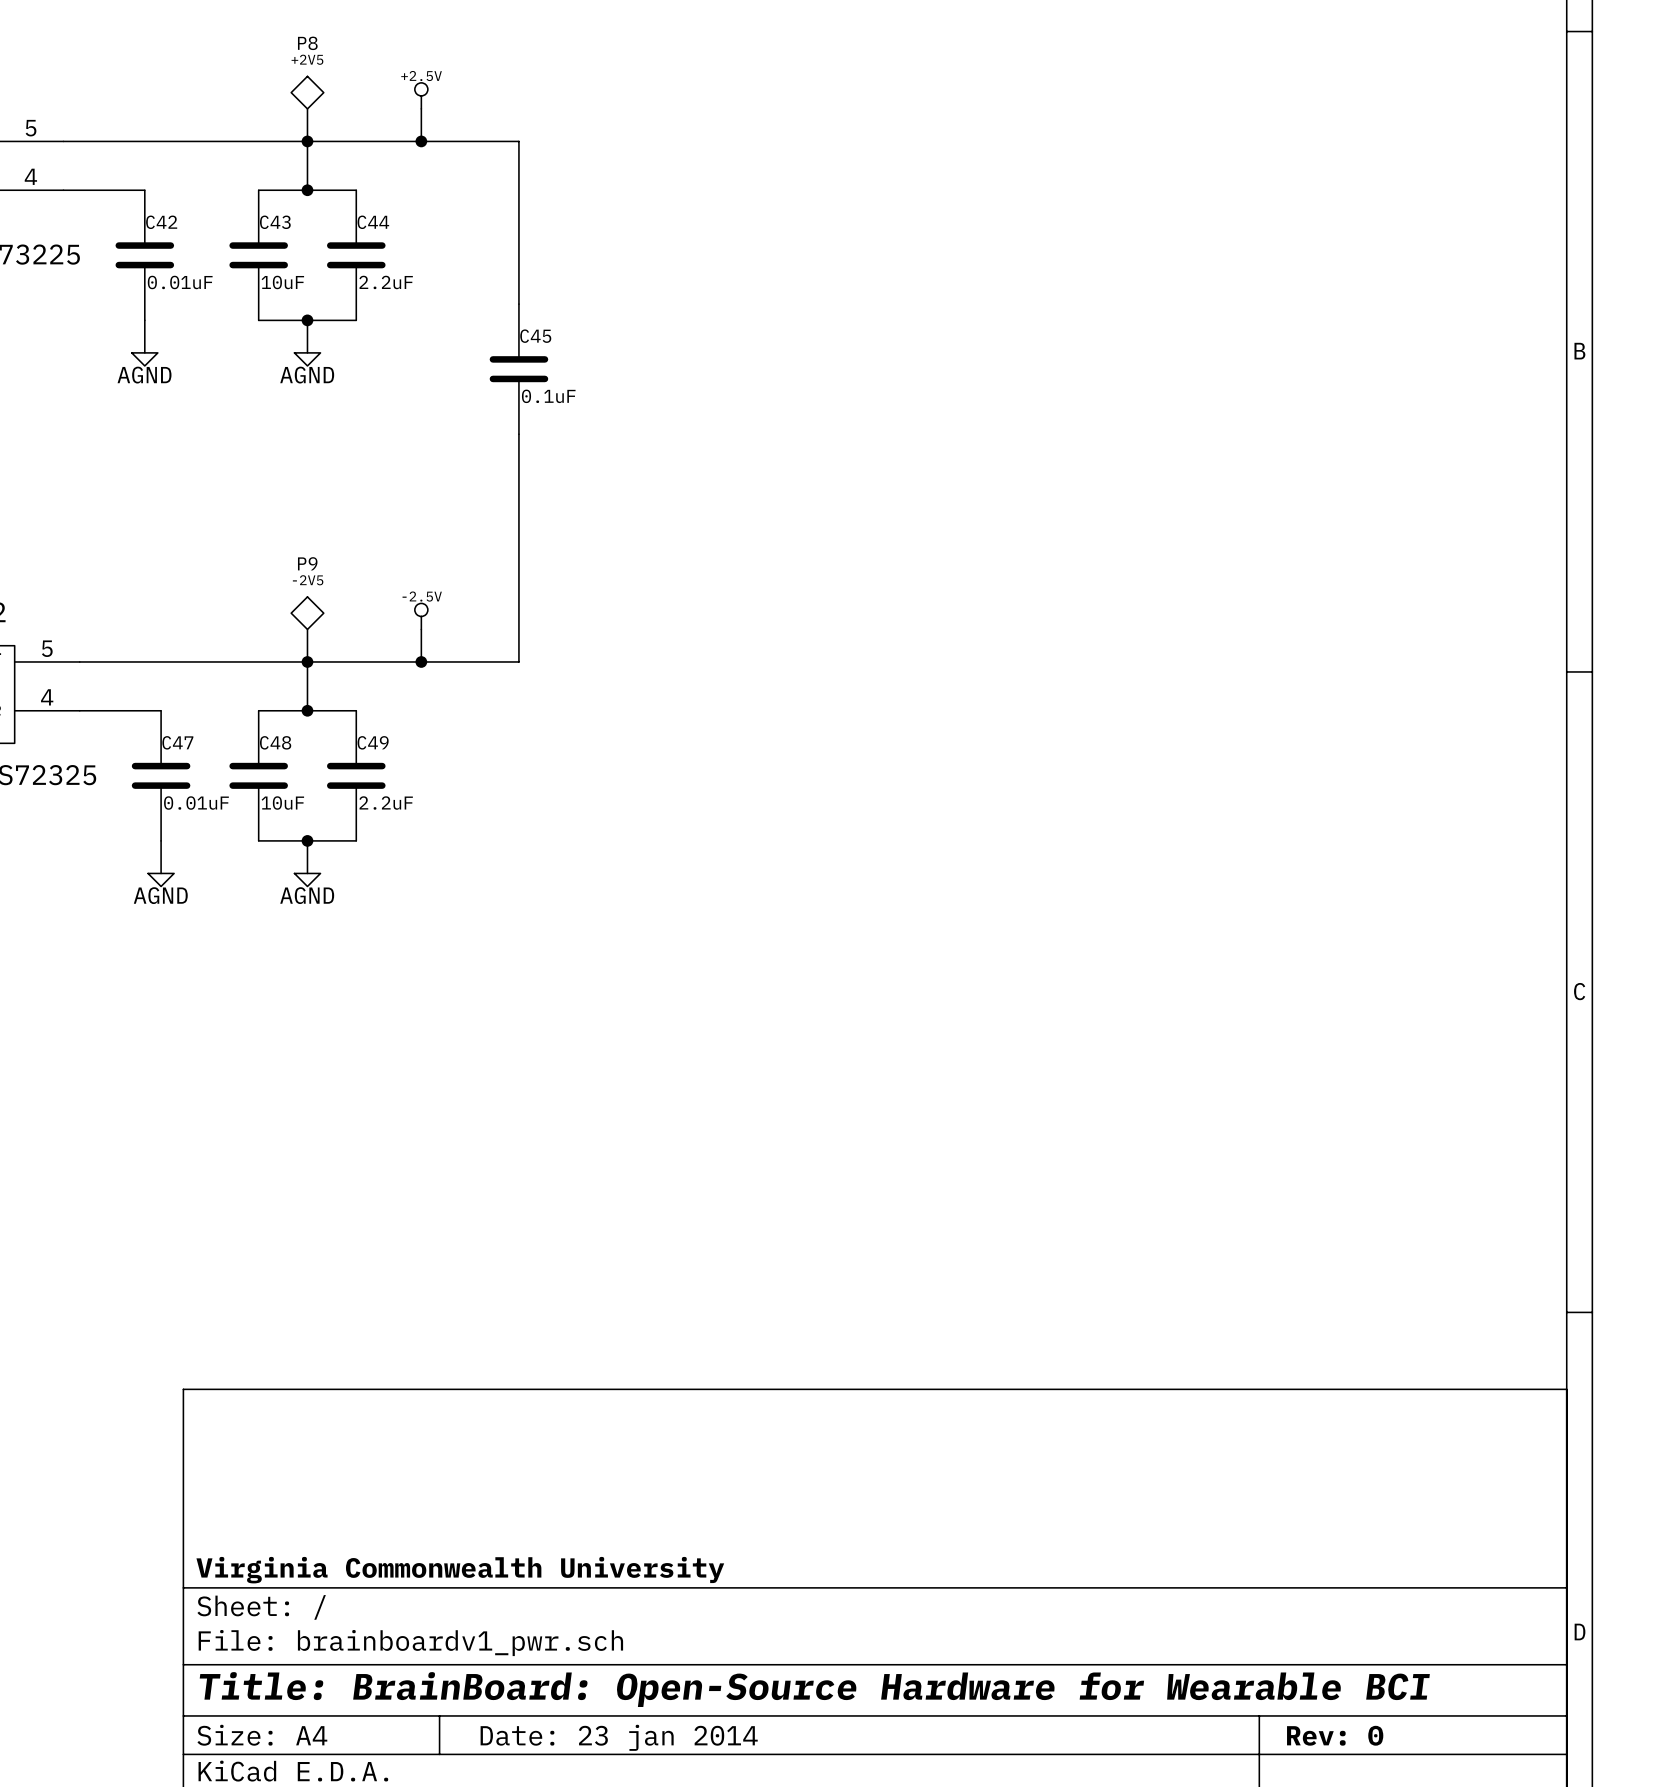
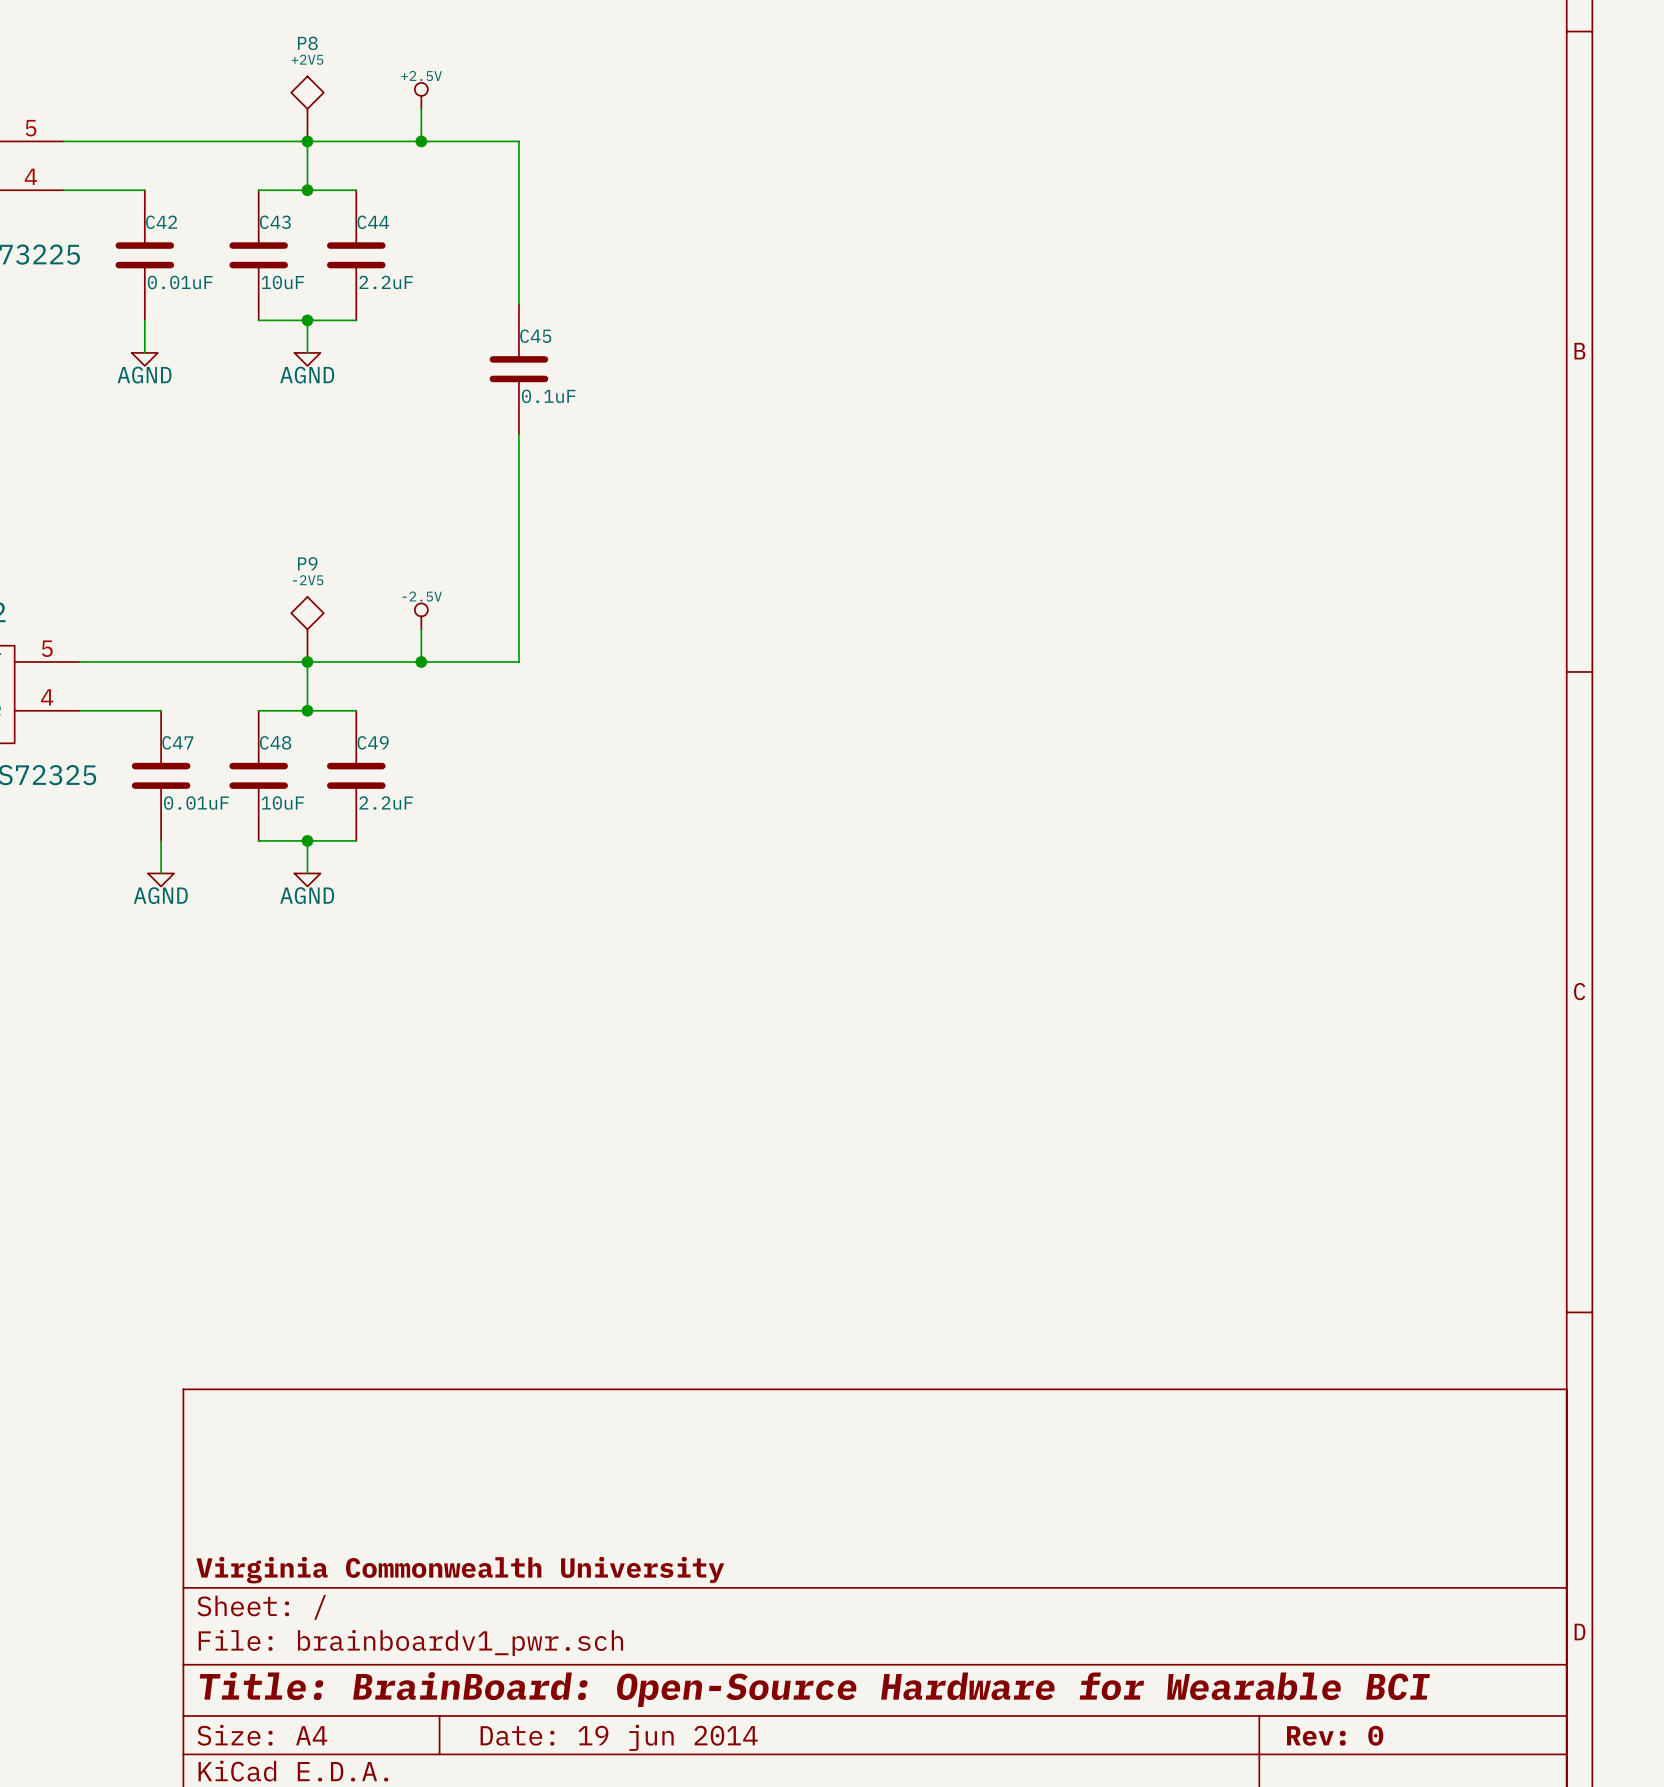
title block: Date: 23 jan 2014 (619, 1737) -> Date: 19 jun 2014 (619, 1737)

